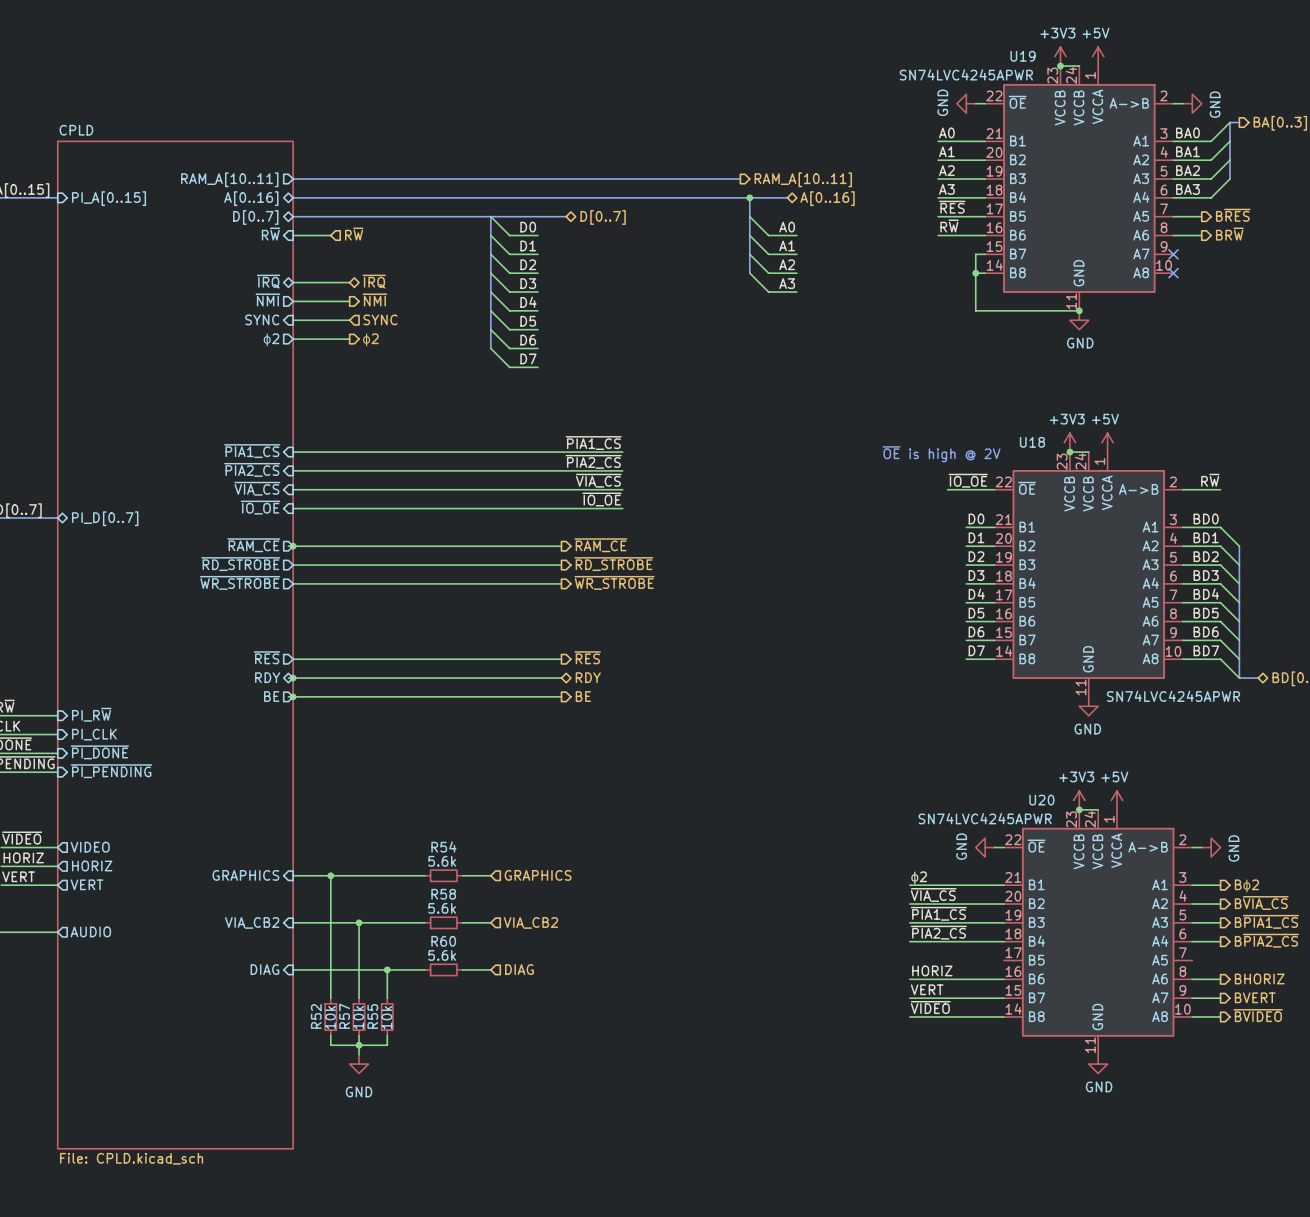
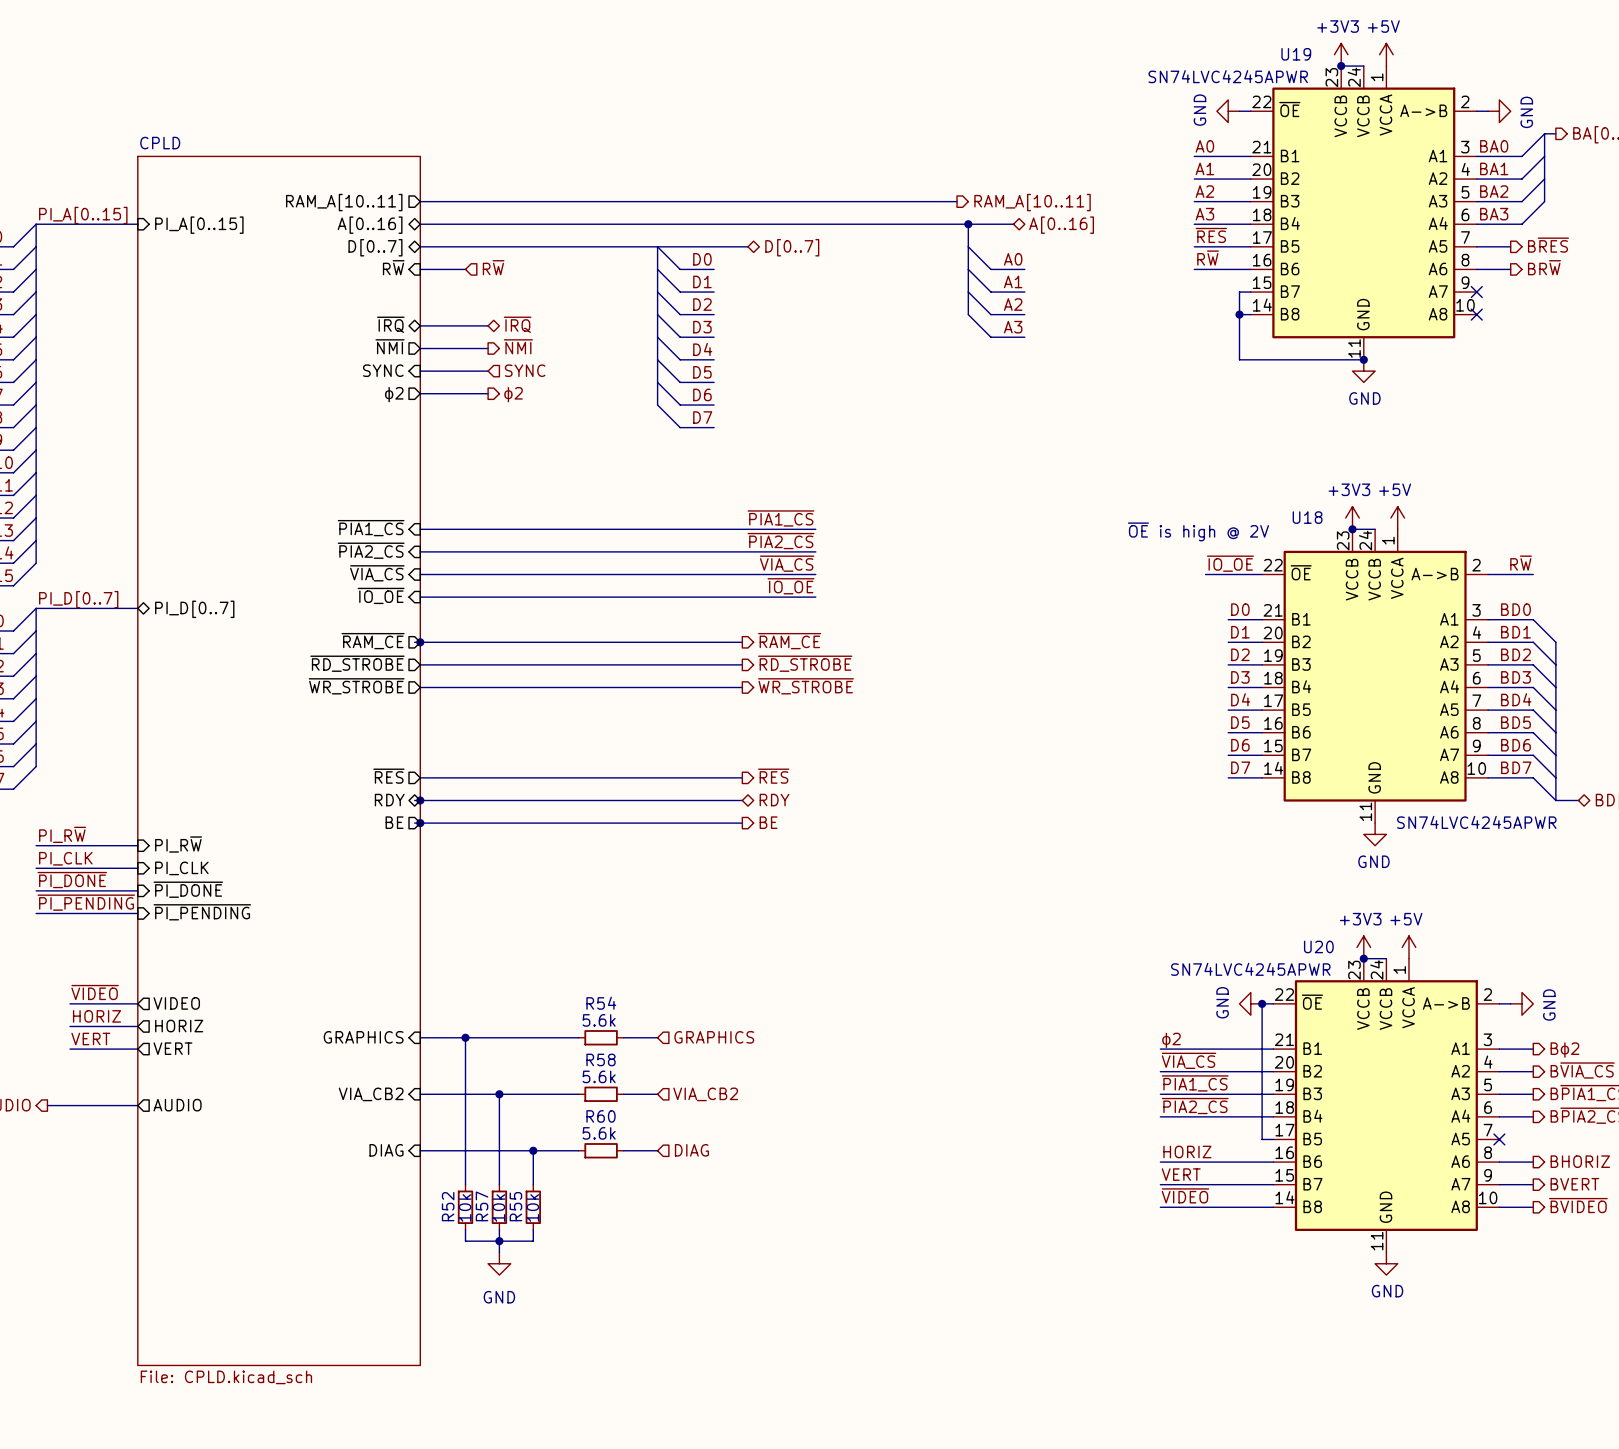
wire: none -> (1262, 1003) (1262, 1139) (1273, 1139)
junction: none -> (1262, 1003)
no-connect mark: none -> (1499, 1139)

